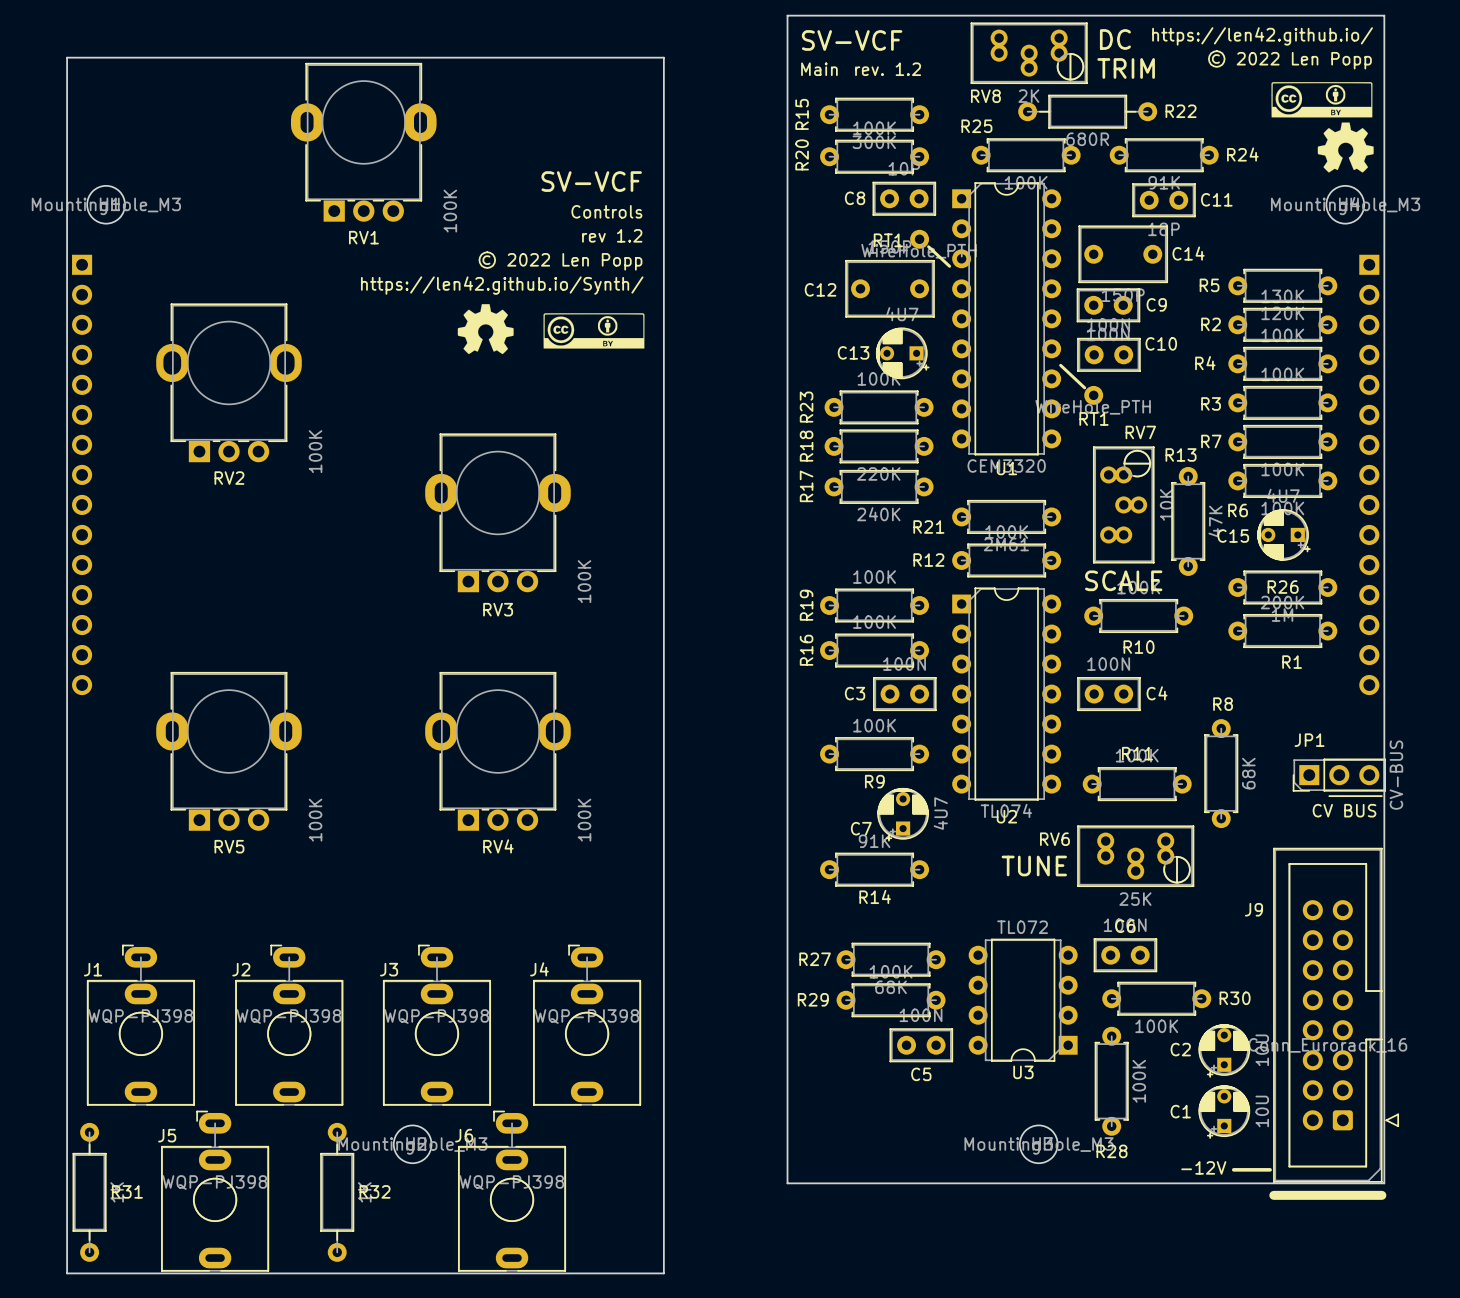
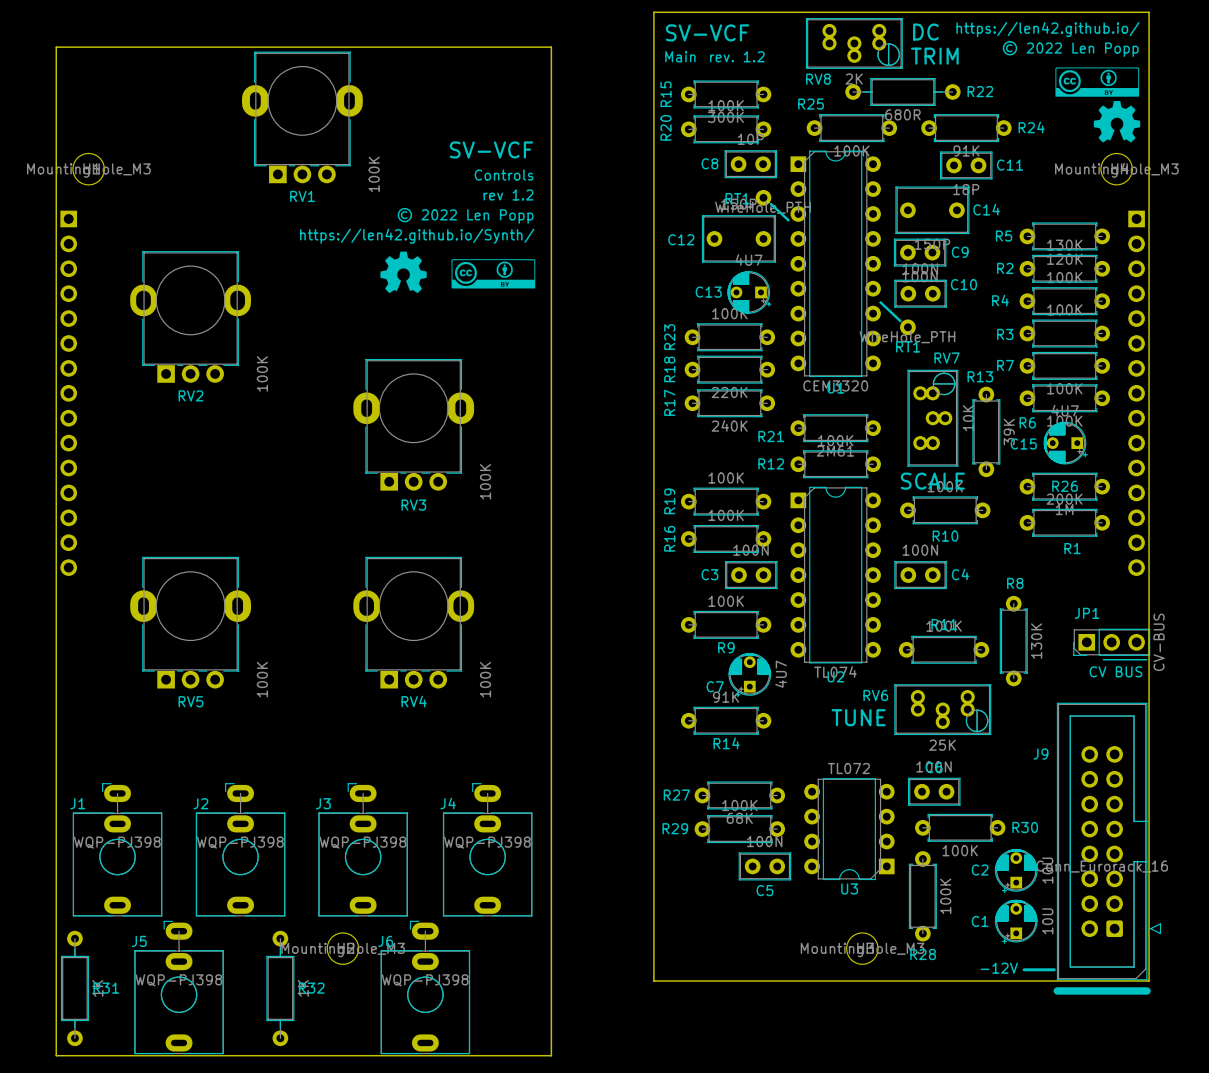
R13 value: 47K (1215, 521) -> 39K (1009, 432)
R8 value: 68K (1248, 773) -> 130K (1036, 641)

